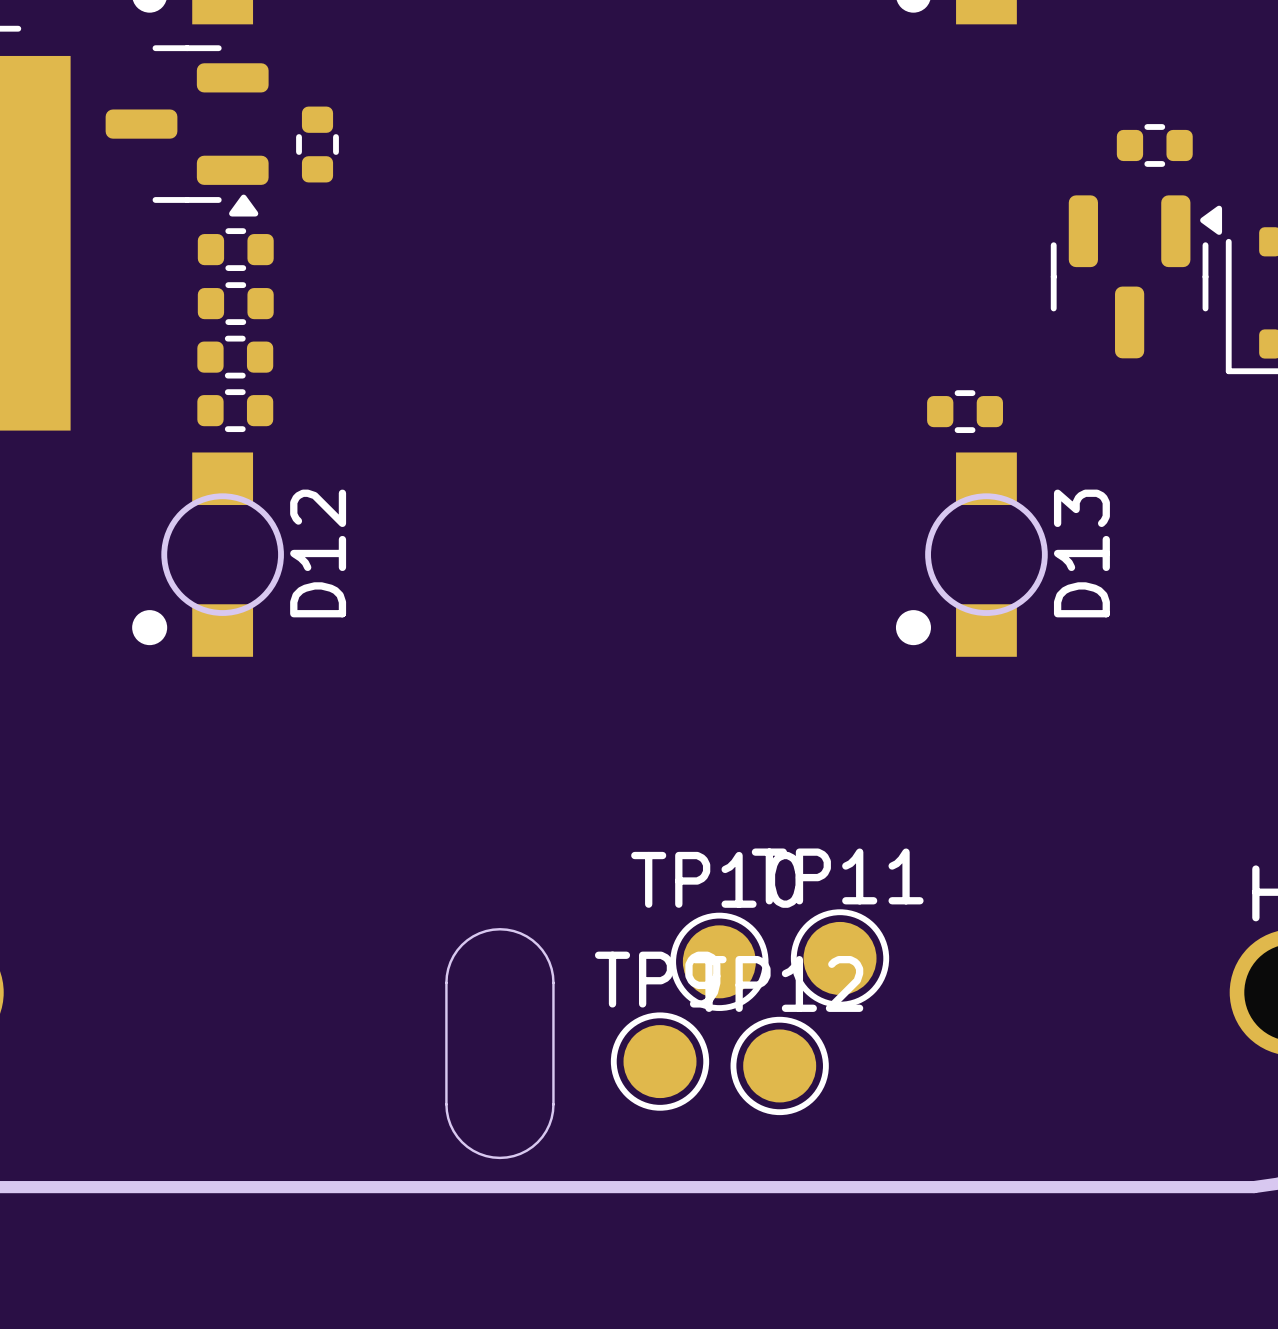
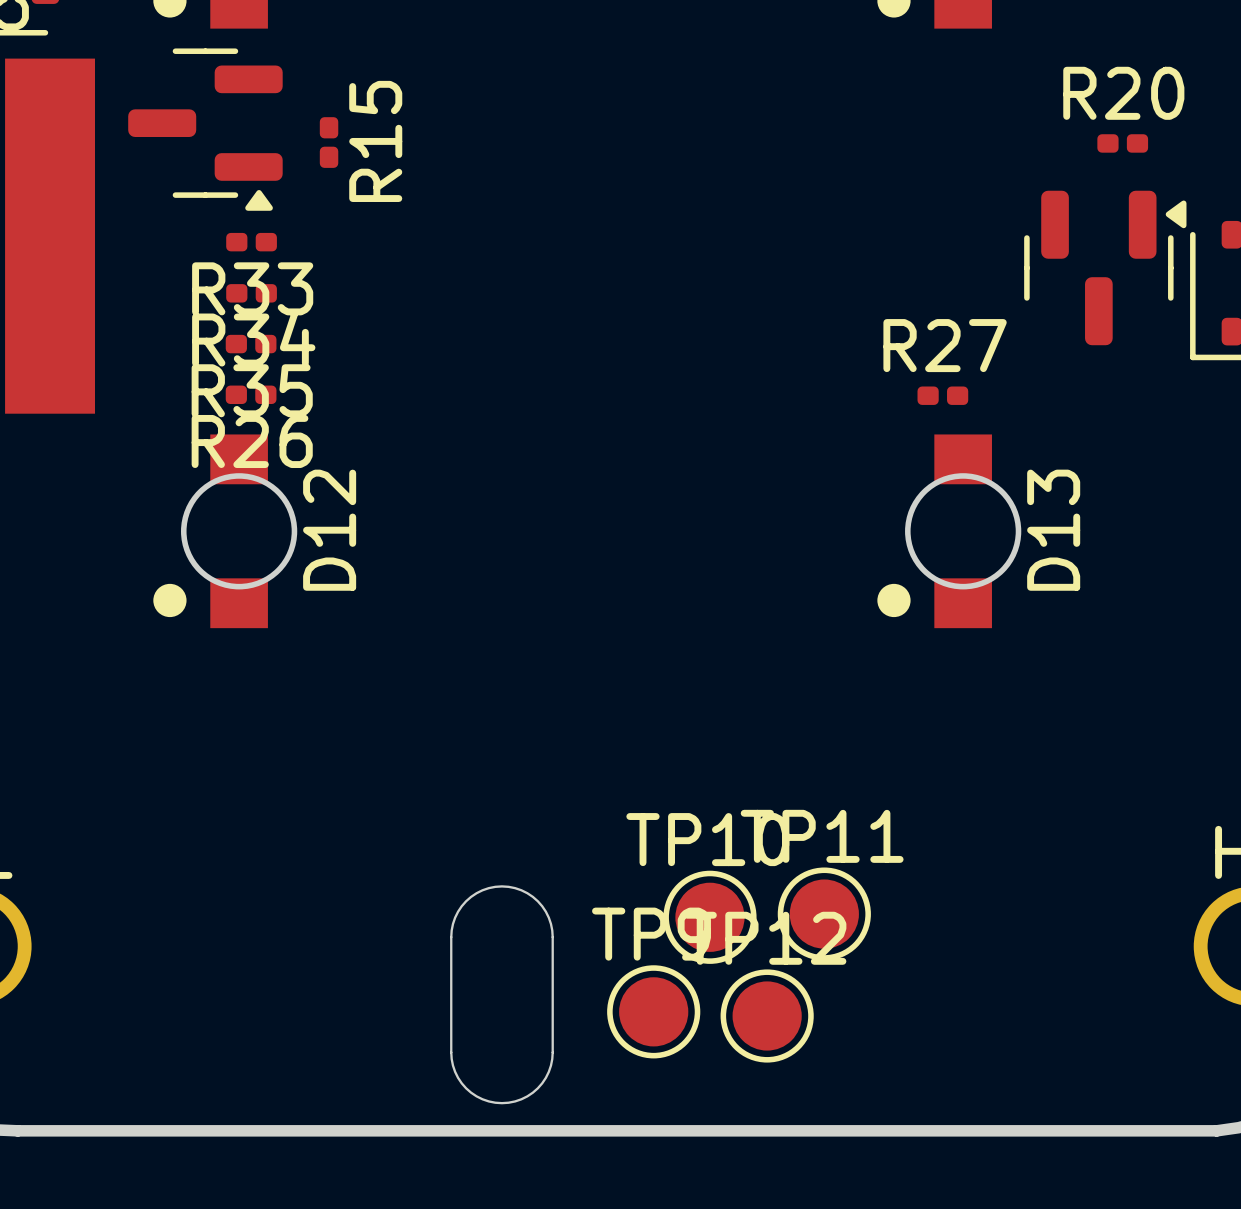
part: (317, 144) -> none
R15: none -> (329, 142)
part: (1154, 145) -> none
R20: none -> (1122, 143)
part: (235, 249) -> none
R33: none -> (251, 242)
part: (235, 303) -> none
R34: none -> (251, 293)
part: (235, 357) -> none
R35: none -> (251, 344)
part: (235, 410) -> none
R26: none -> (251, 394)
part: (965, 411) -> none
R27: none -> (942, 395)

